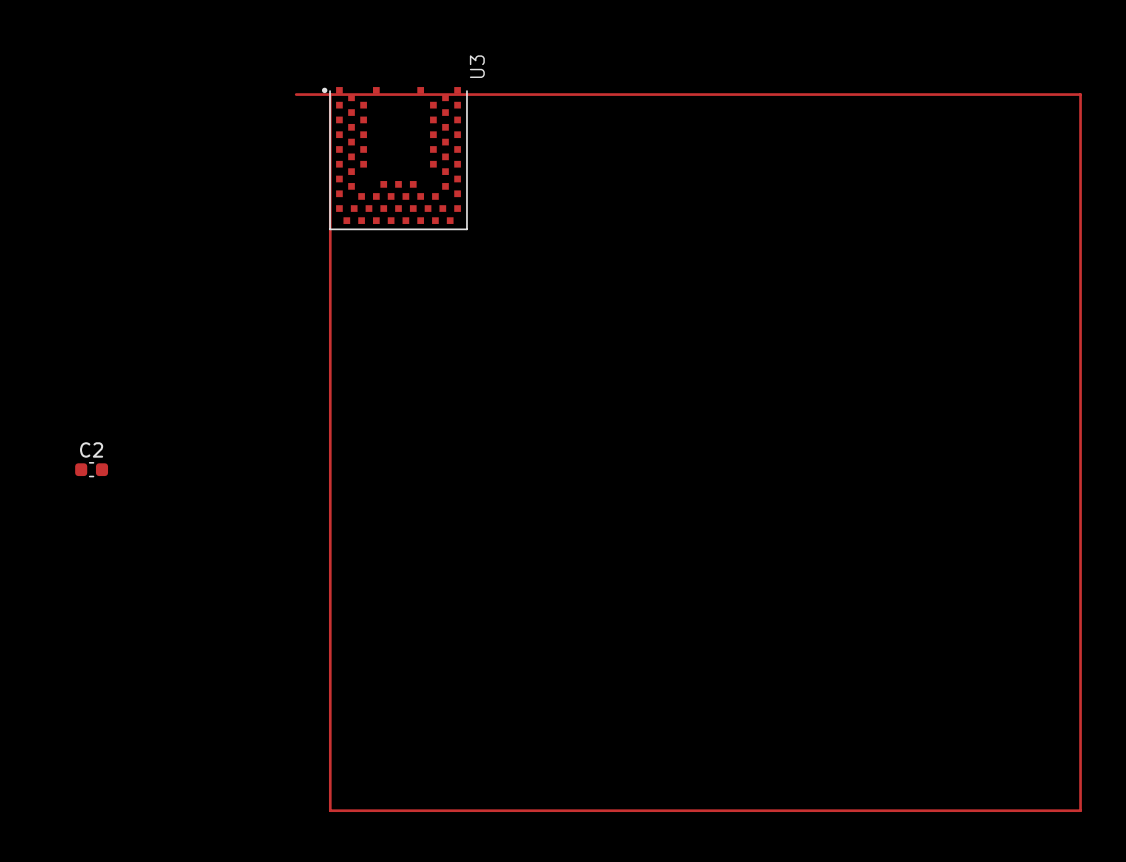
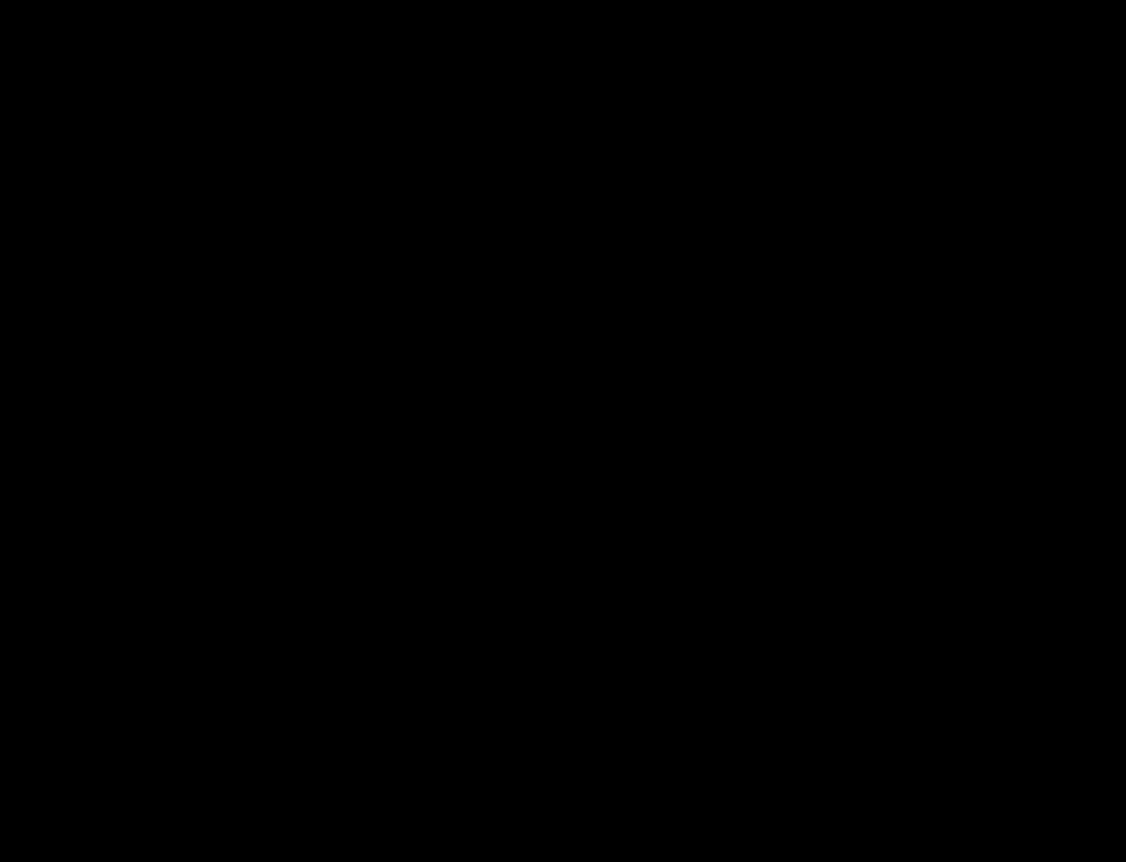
track: (296, 94) (1080, 94) (1080, 810) (330, 810) (330, 94) -> none
U3: (394, 158) -> none
C2: (91, 469) -> none

